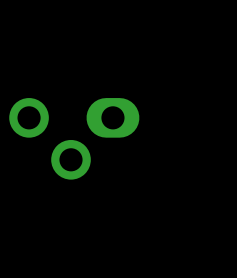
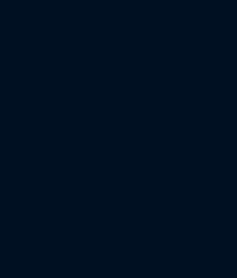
part: (74, 138) -> none

